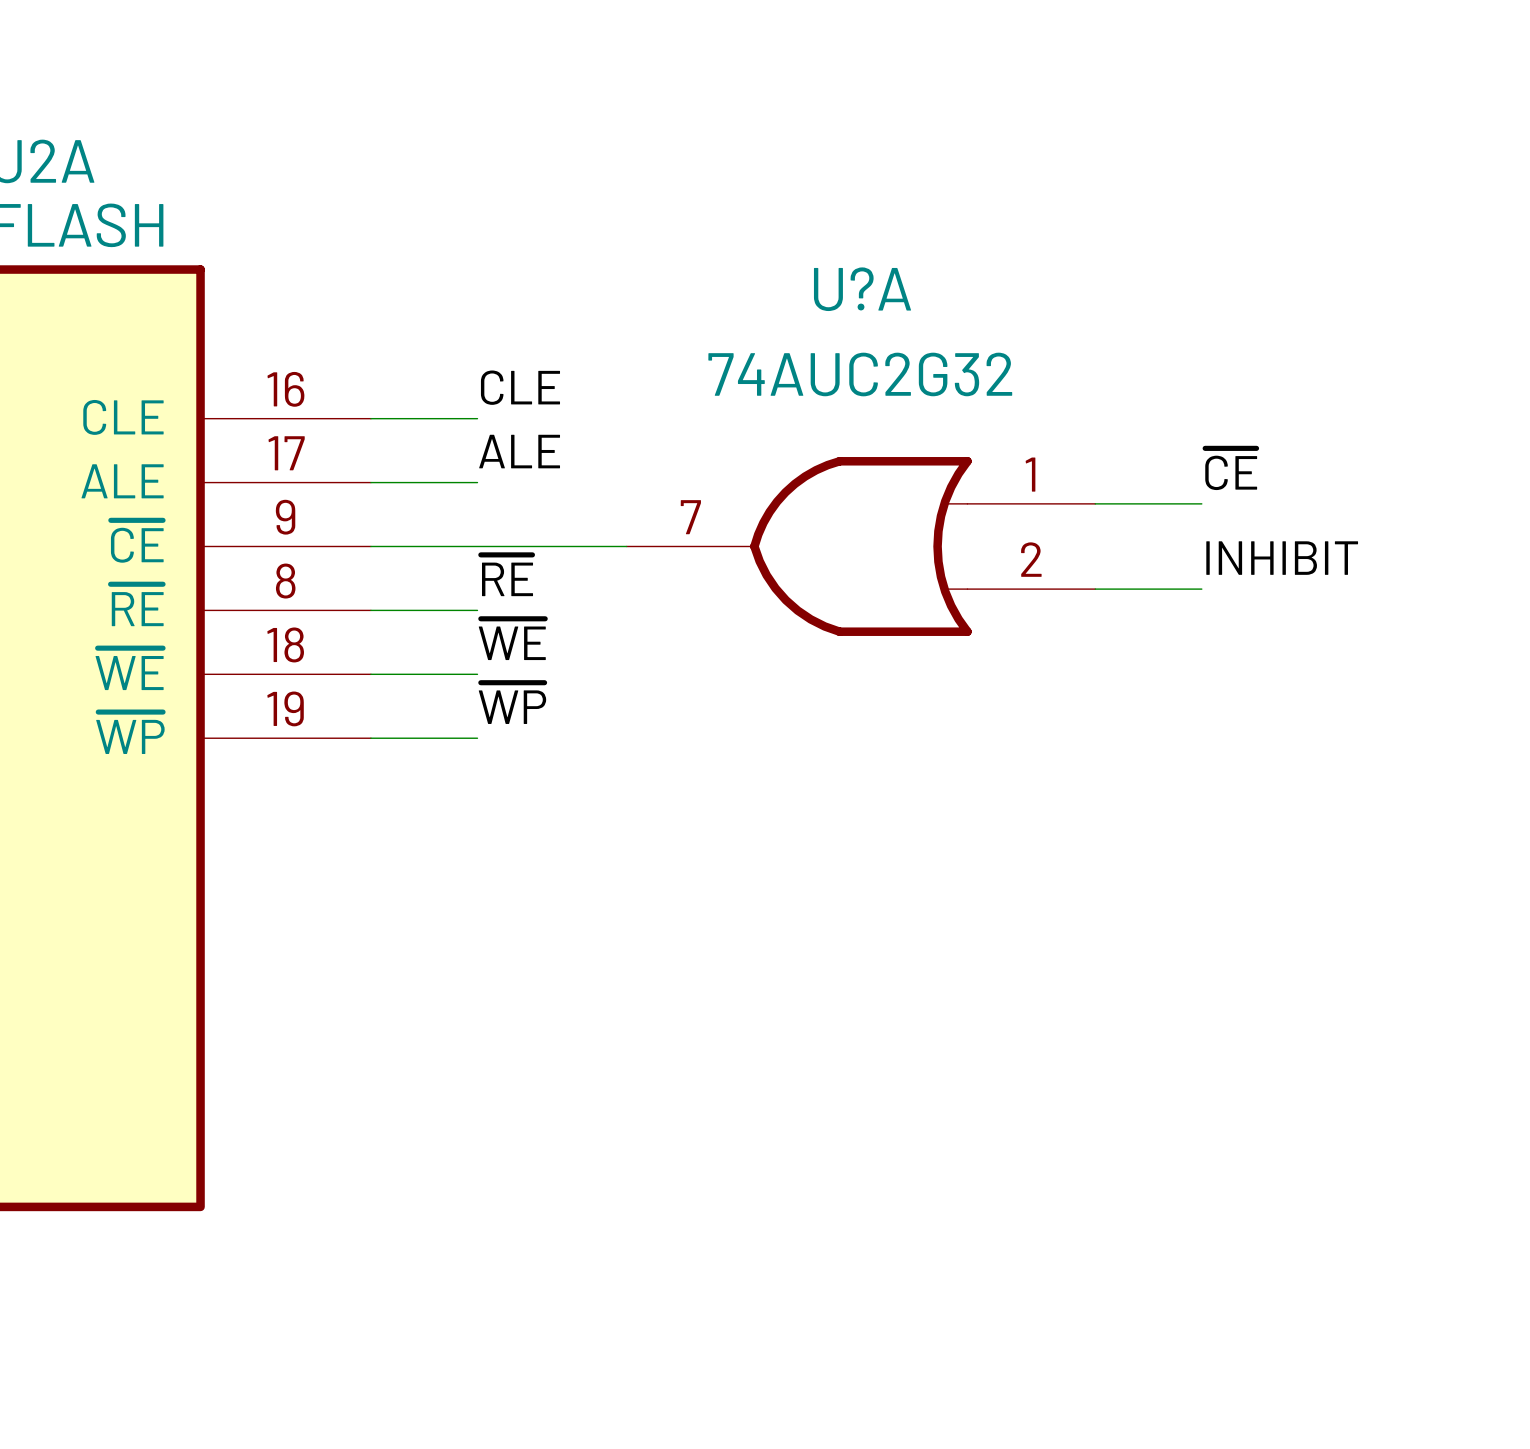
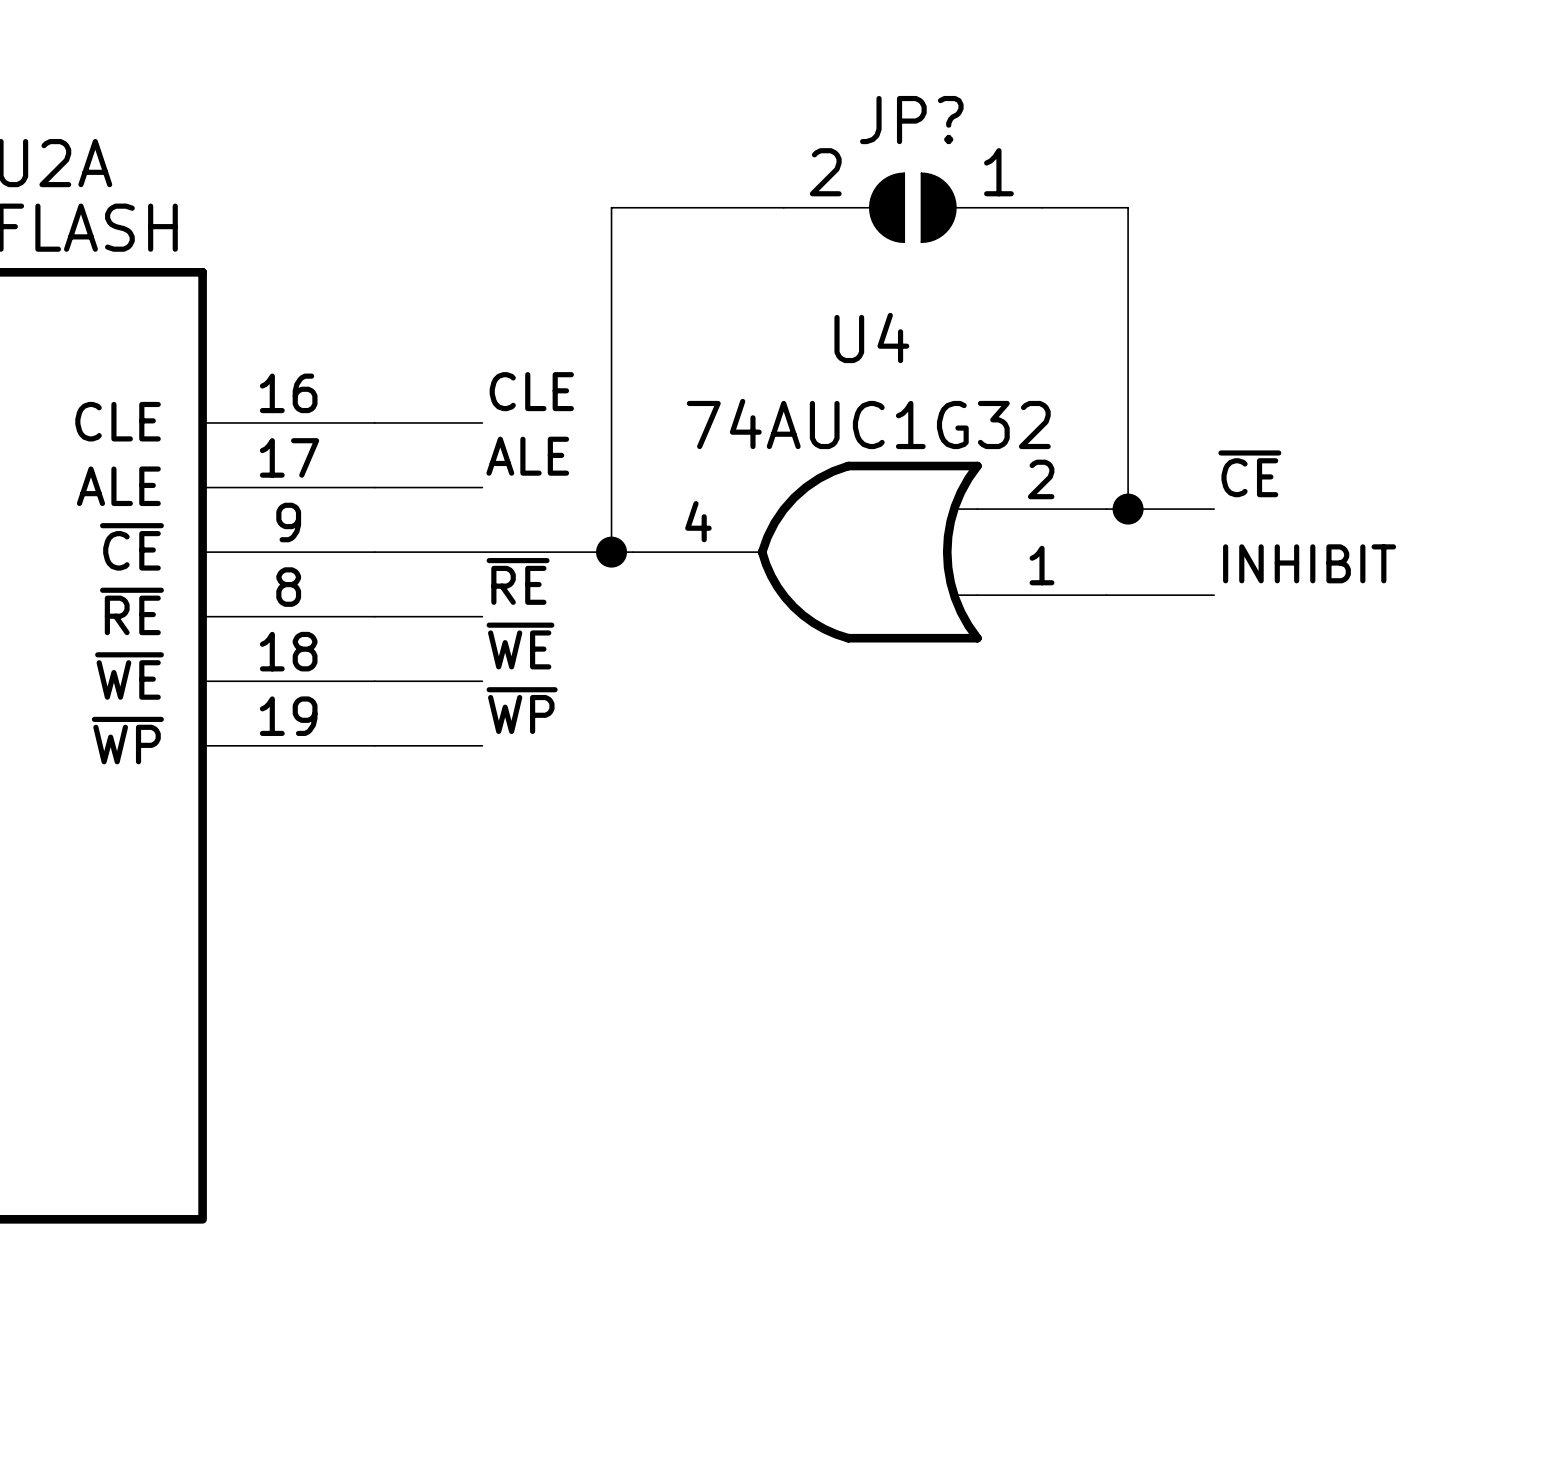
wire: none -> (783, 207) (611, 207) (611, 552)
JP?: none -> (912, 207)
wire: none -> (1041, 207) (1128, 207) (1128, 509)
junction: none -> (1128, 509)
junction: none -> (611, 552)
U?A: 74AUC2G32 (860, 546) -> none
U4: none -> 74AUC1G32 (869, 552)

